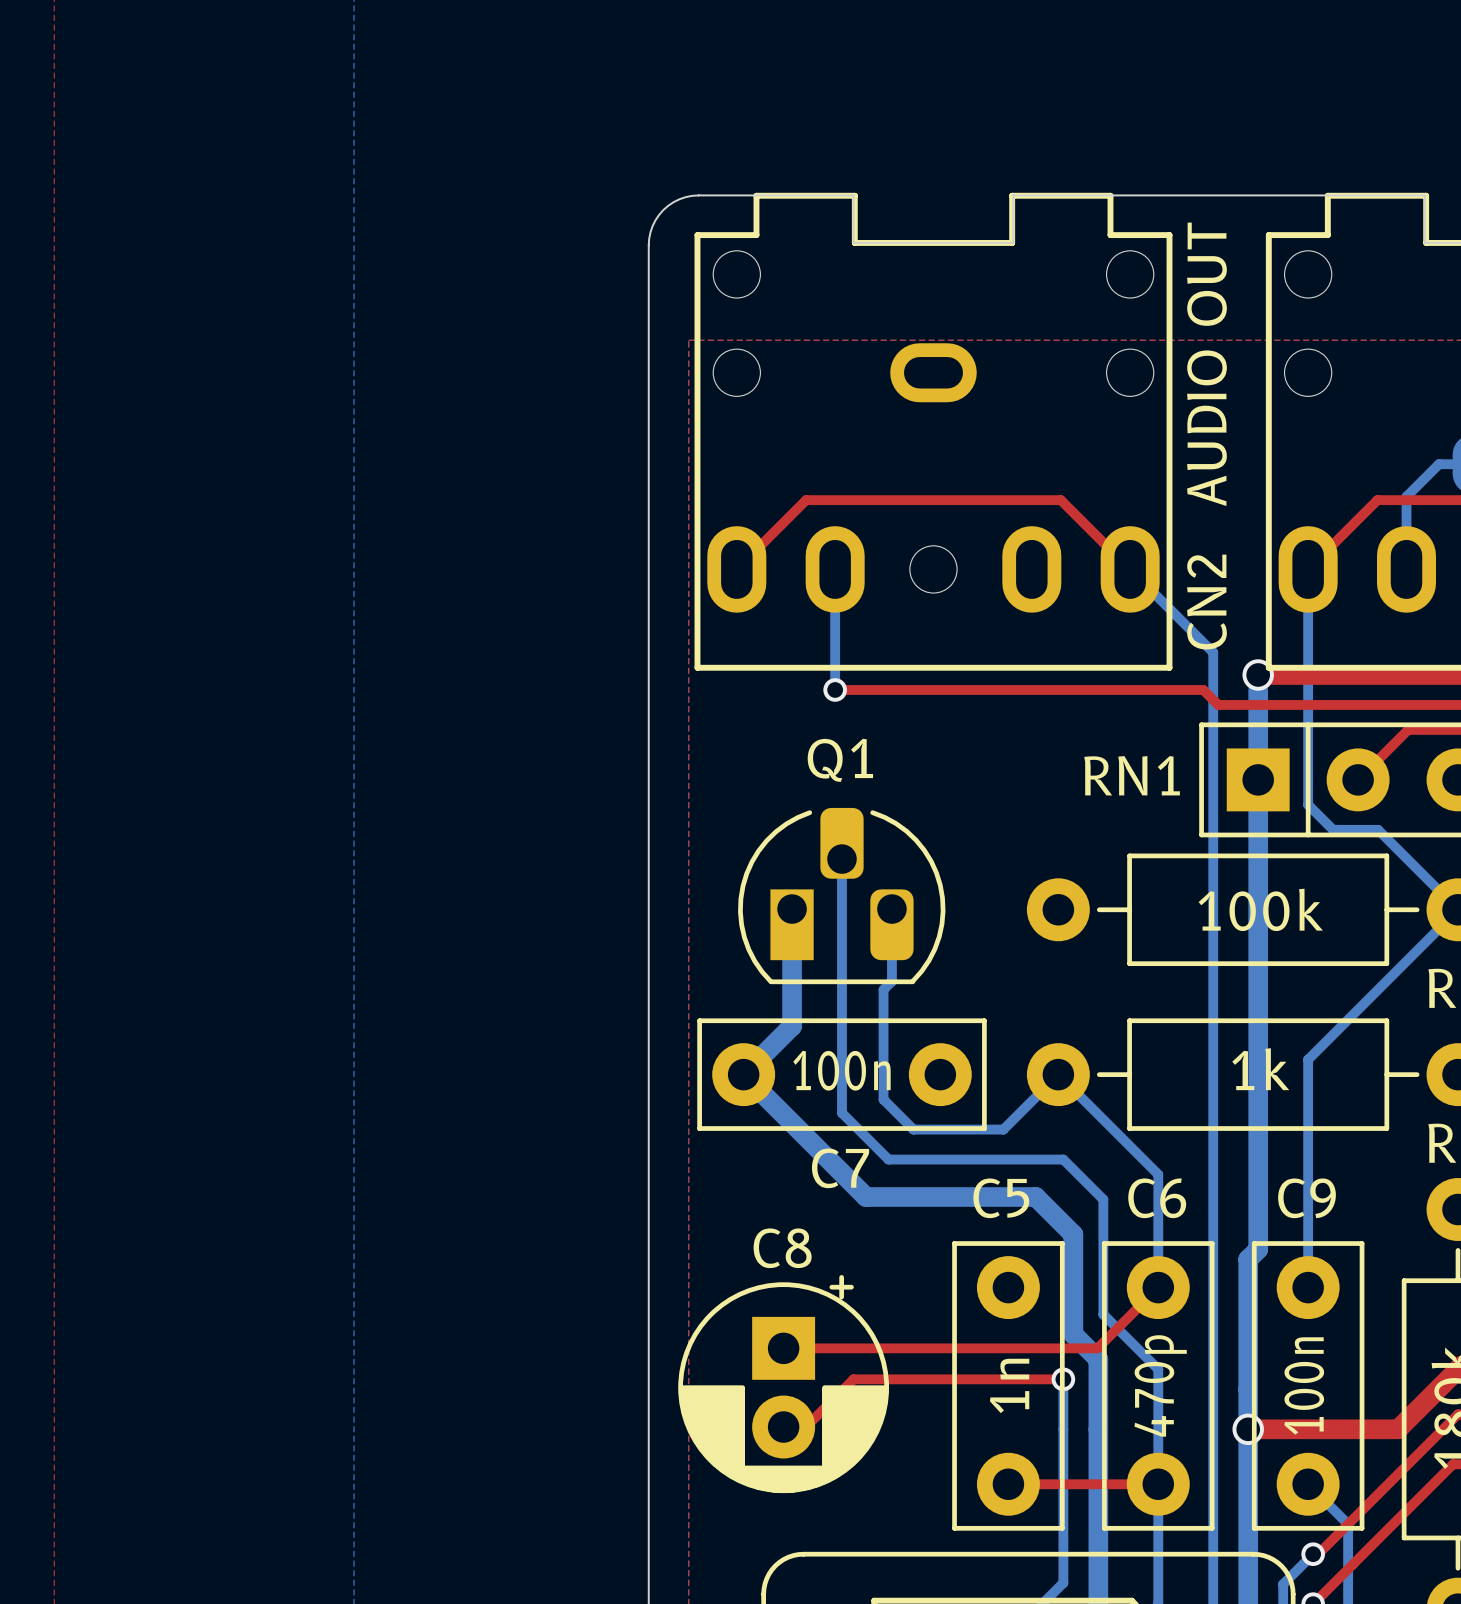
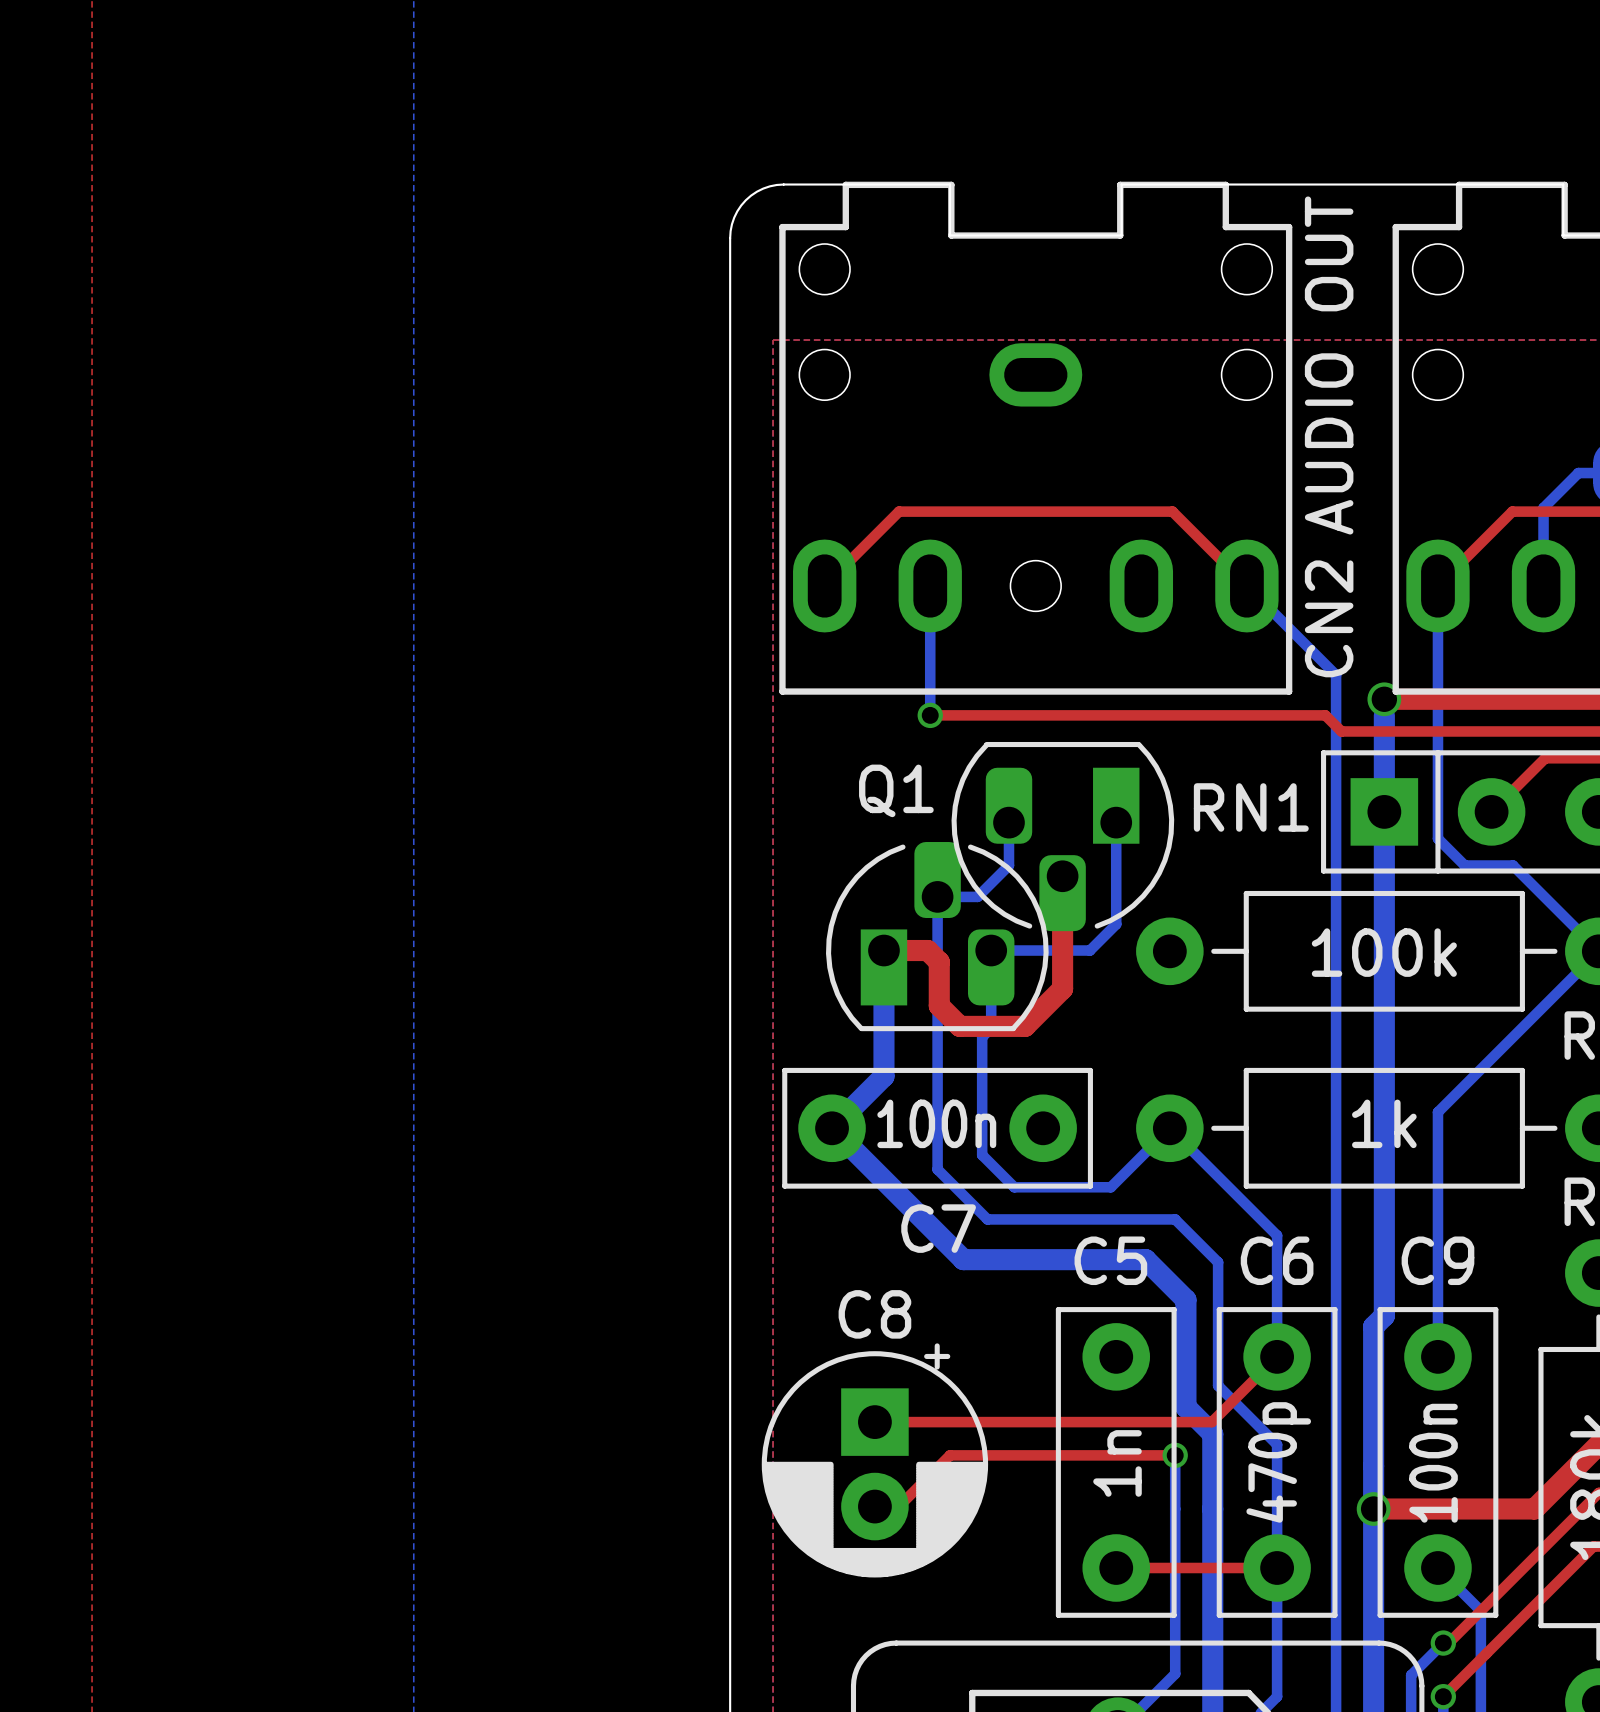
Q1 name position: Q1 (840, 760) -> Q1 (896, 790)
bottom track: none -> (1008, 822) (1008, 865) (977, 896) (937, 896)
bottom track: none -> (1116, 827) (1116, 924) (1090, 950) (991, 950)
part: none -> (1062, 836)
top track: none -> (1062, 881) (1062, 988) (1025, 1026) (959, 1026) (939, 1005) (939, 962) (927, 950) (883, 950)

